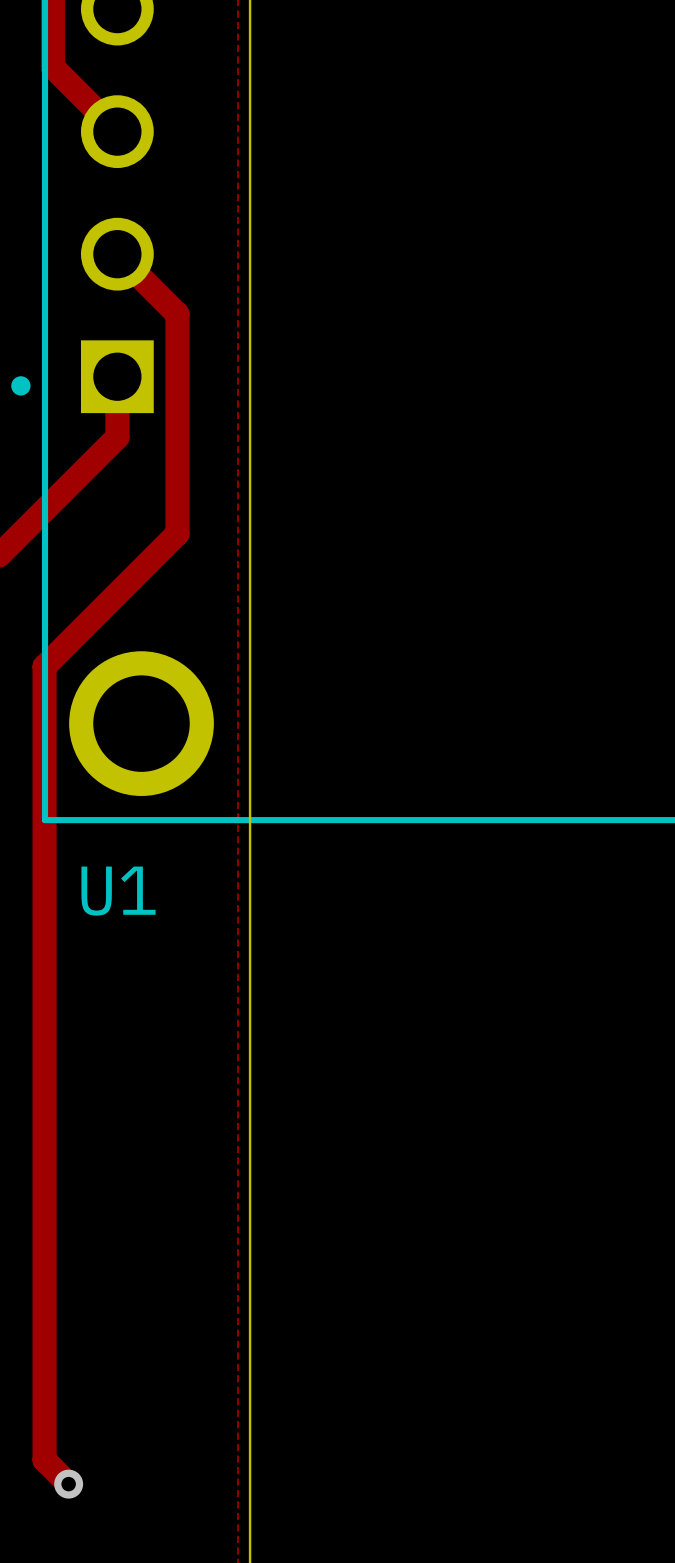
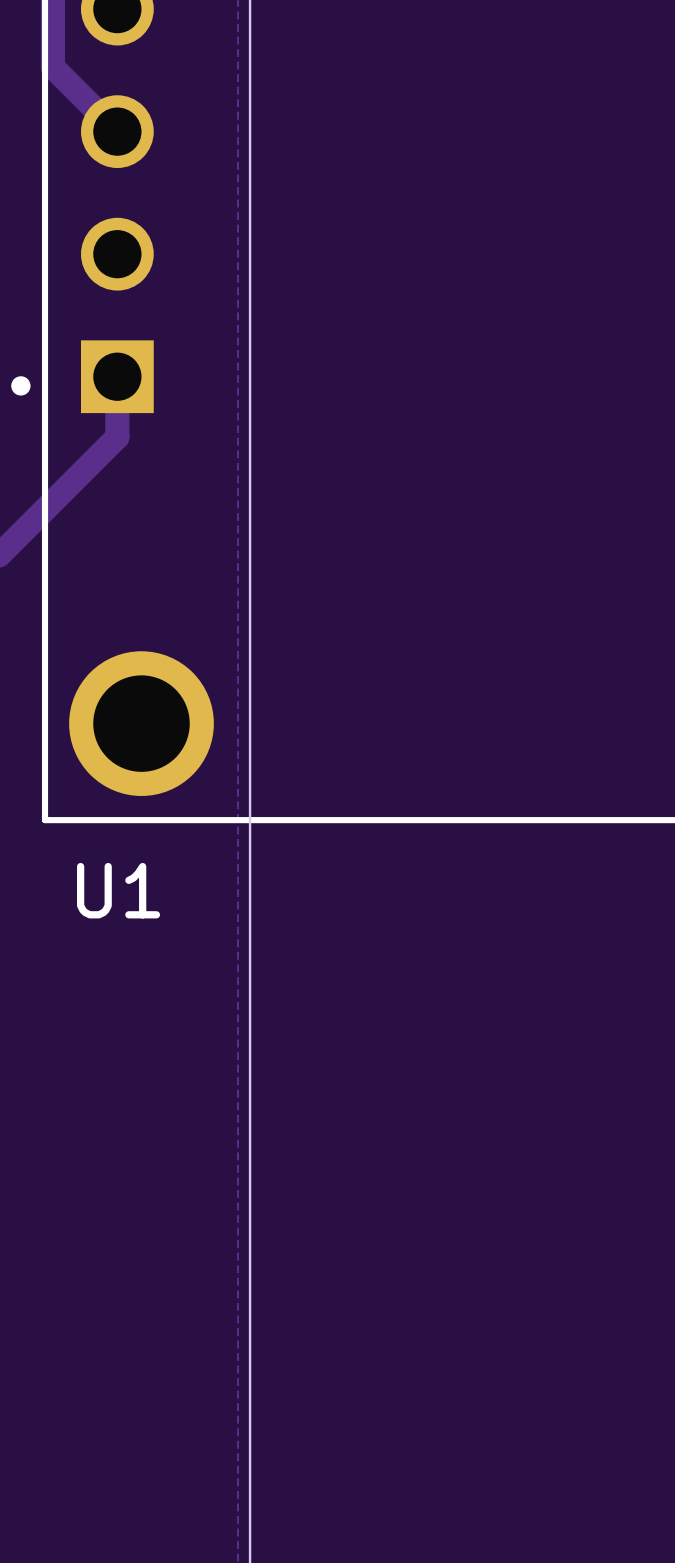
track: (117, 254) (177, 314) (177, 533) (44, 666) (44, 1460) (68, 1484) -> none
via: (68, 1484) -> none

